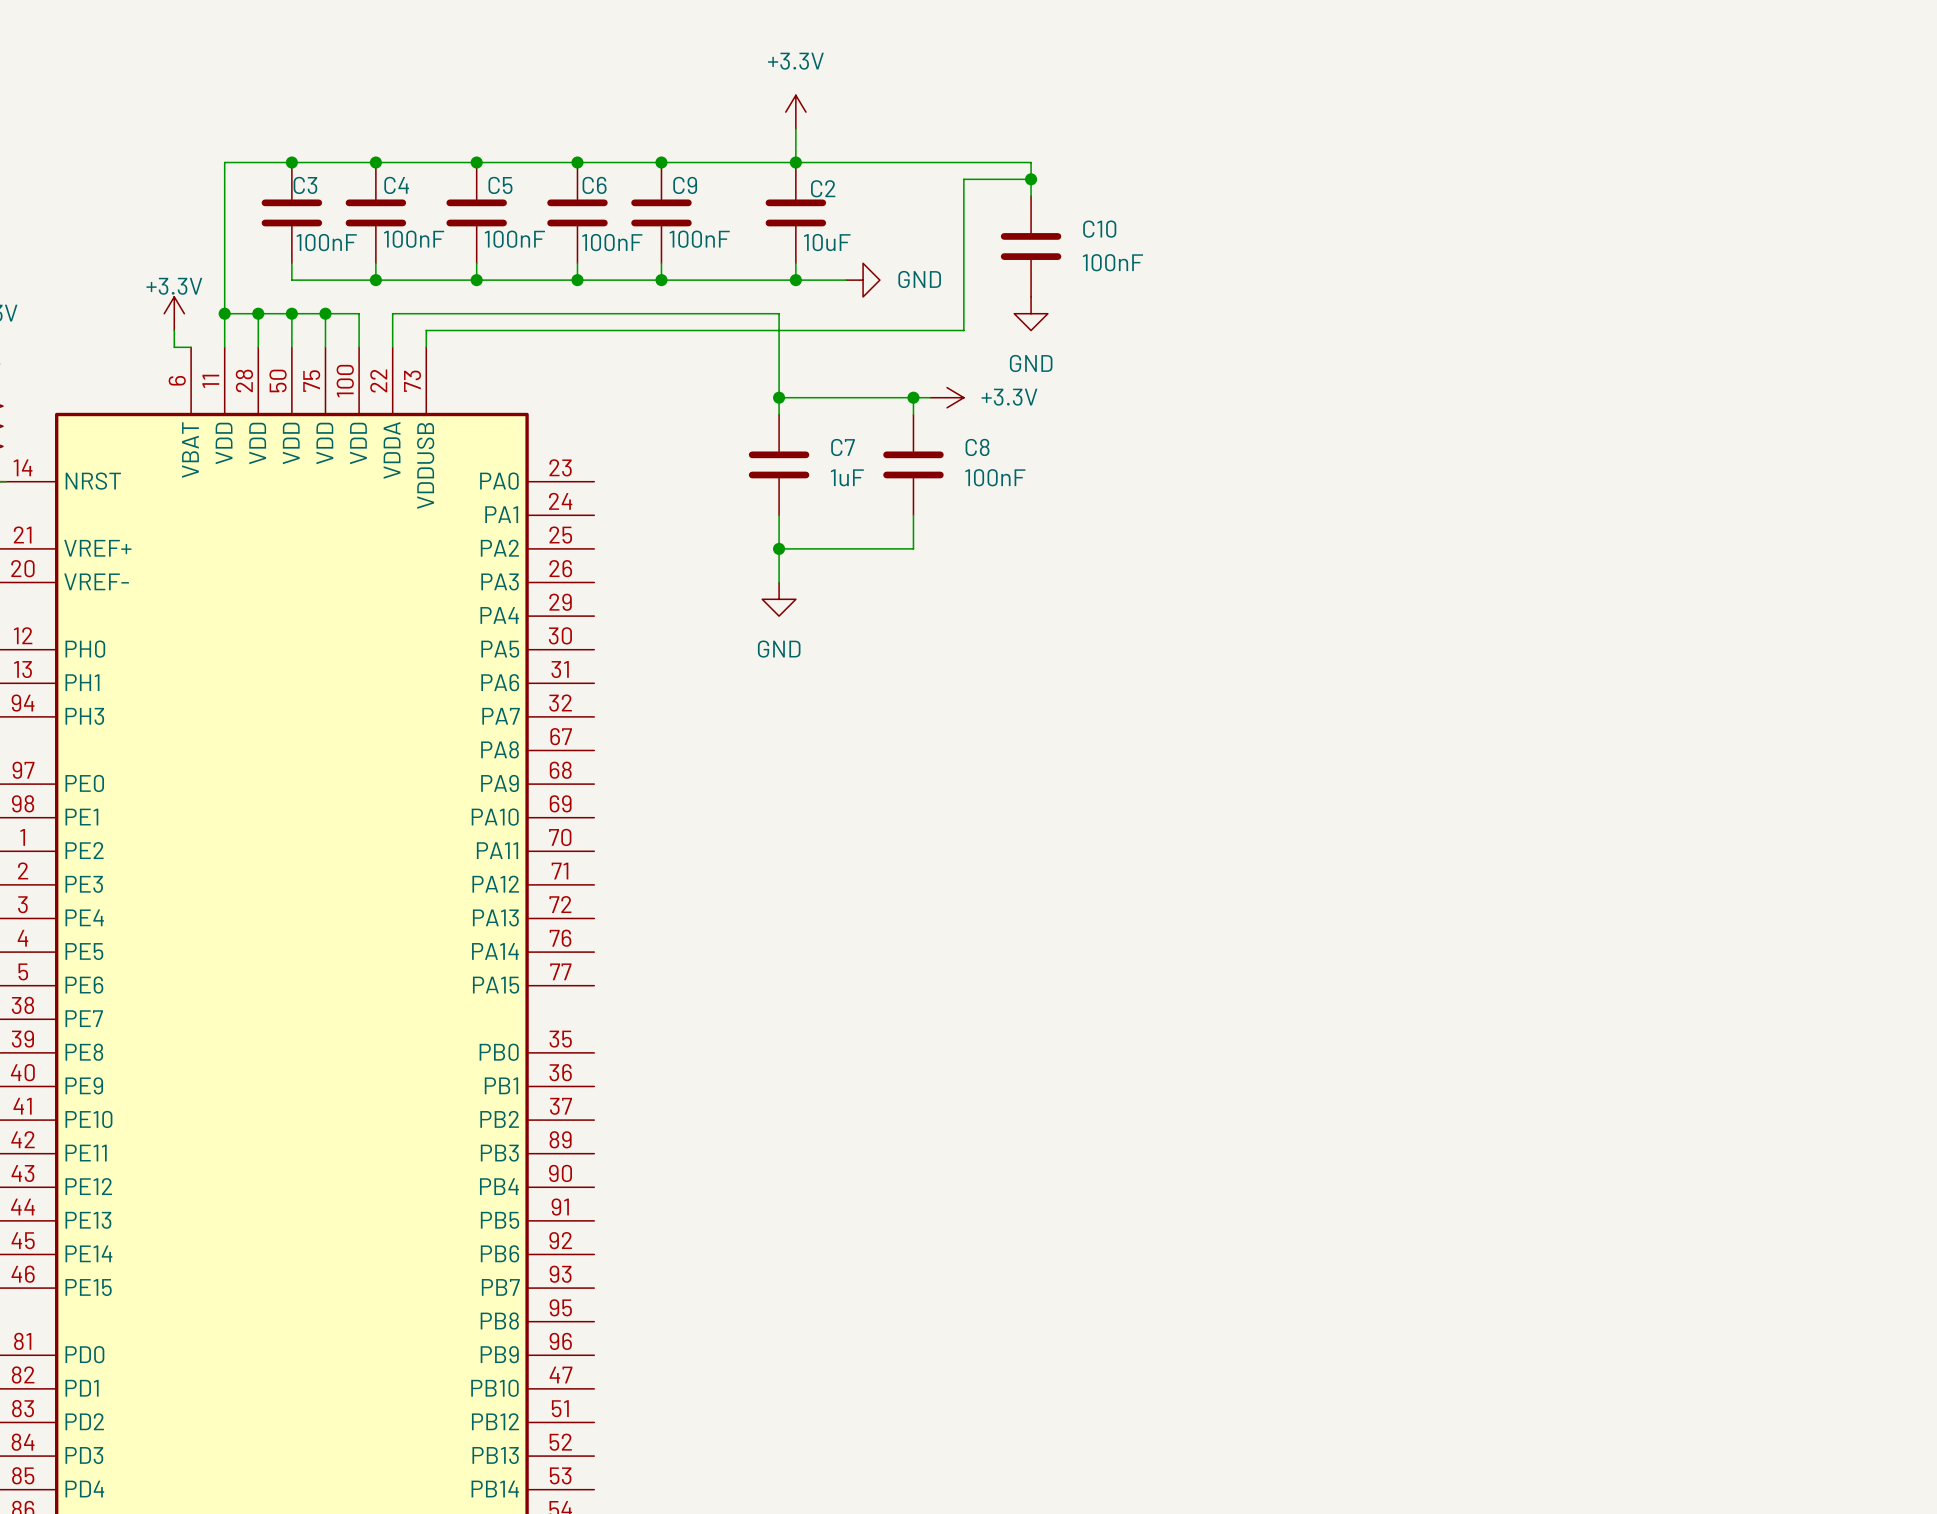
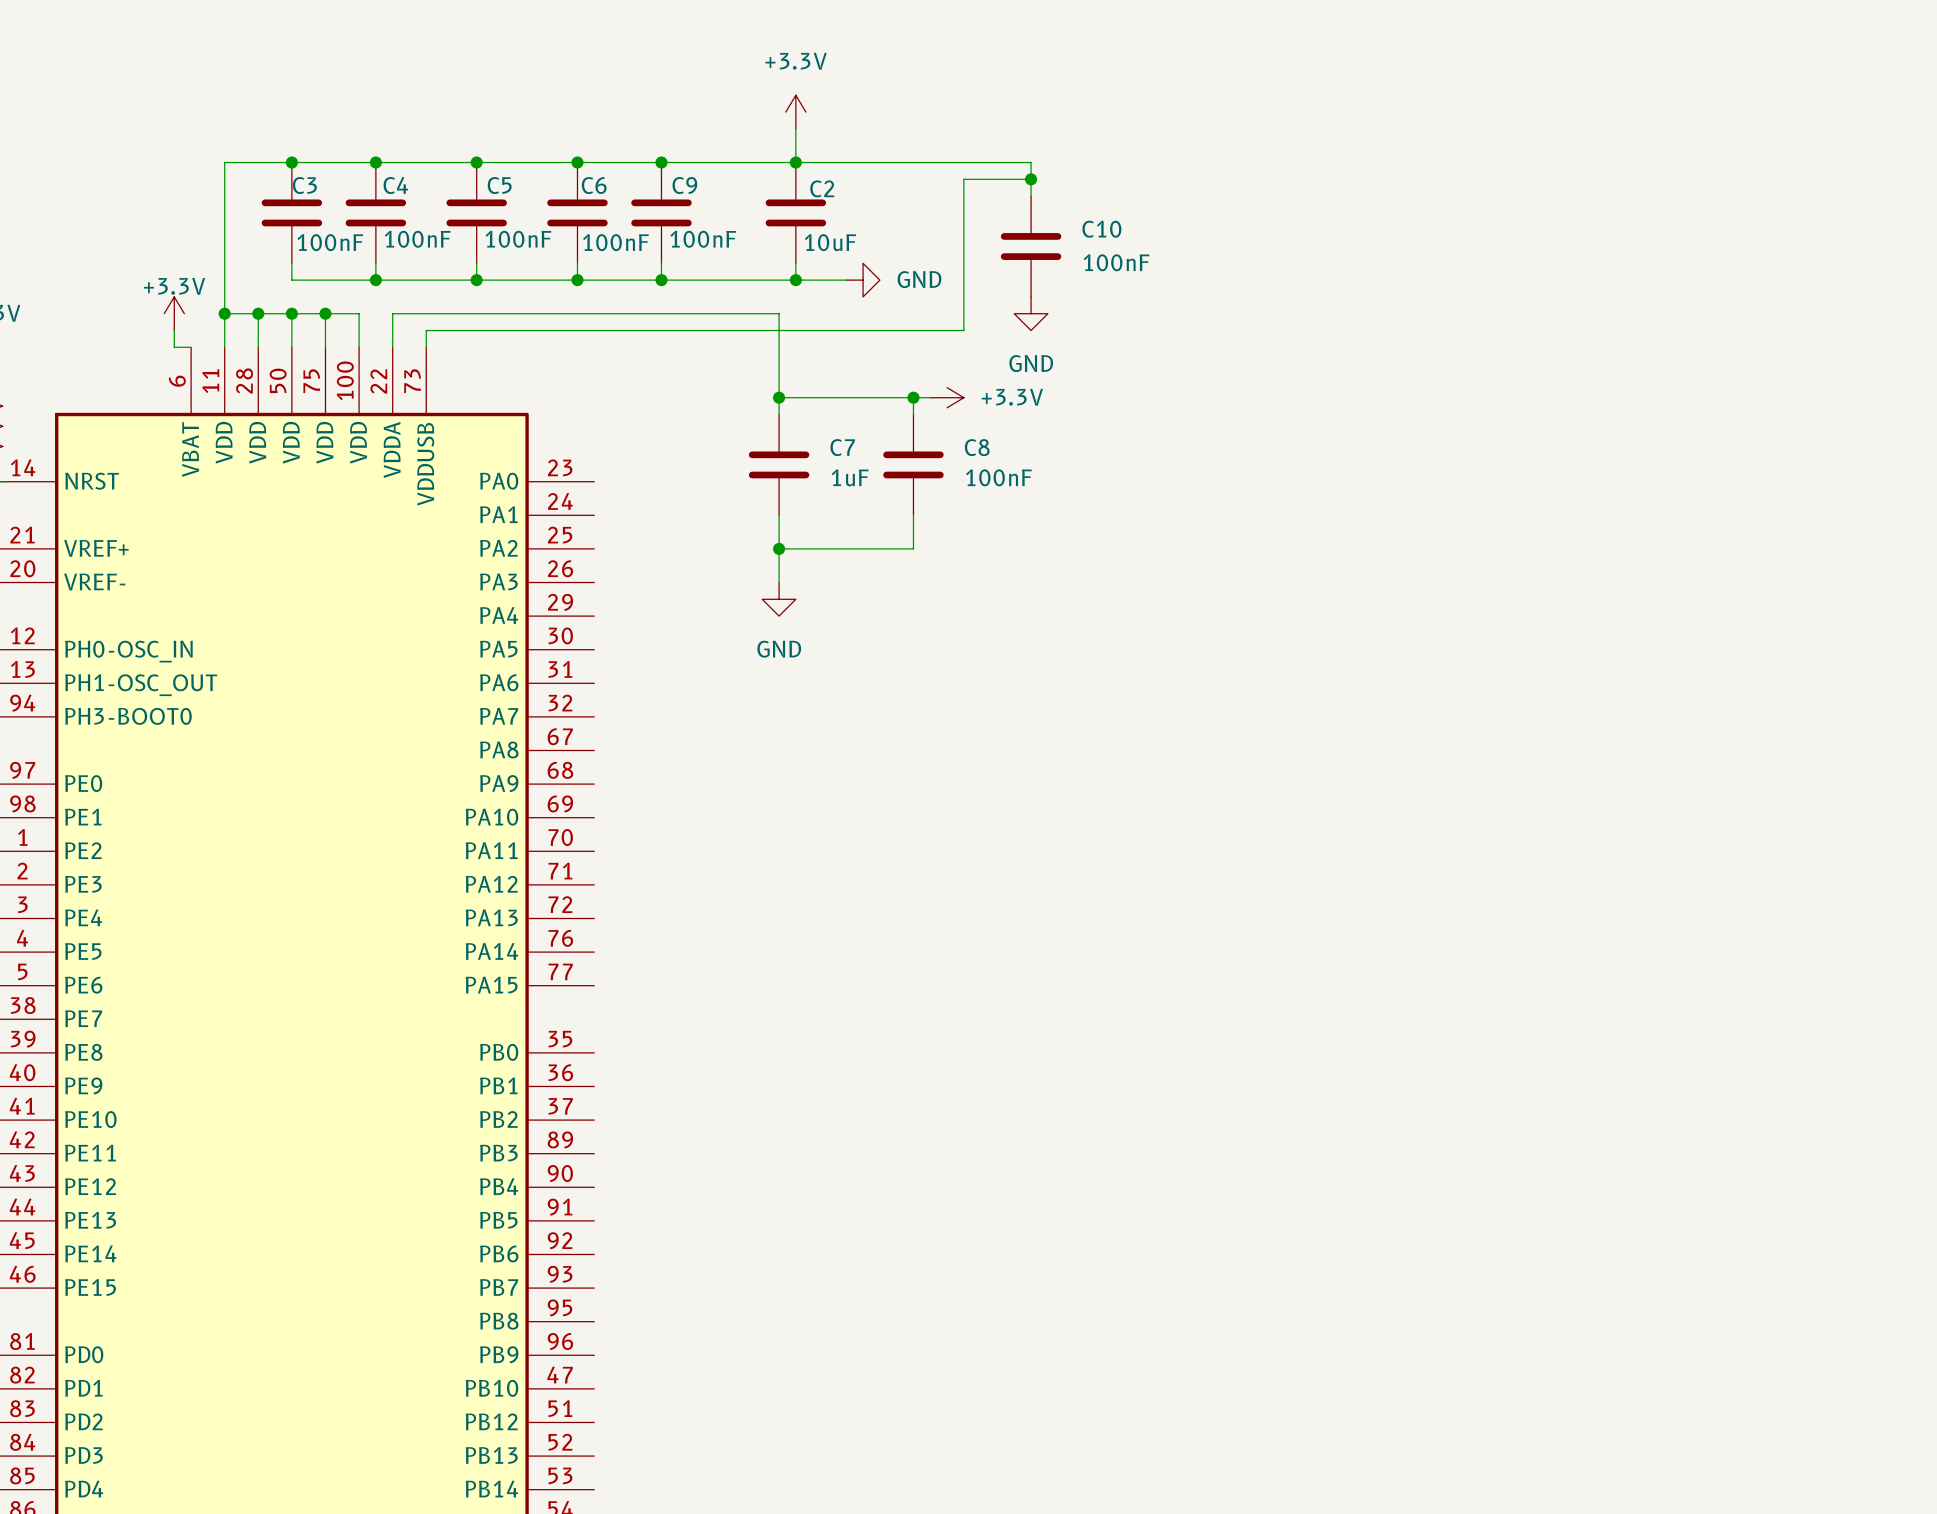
part pin name: PH0 (85, 649) -> PH0-OSC_IN (128, 651)
part pin name: PH1 (82, 682) -> PH1-OSC_OUT (141, 685)
part pin name: PH3 (84, 716) -> PH3-BOOT0 (128, 716)

